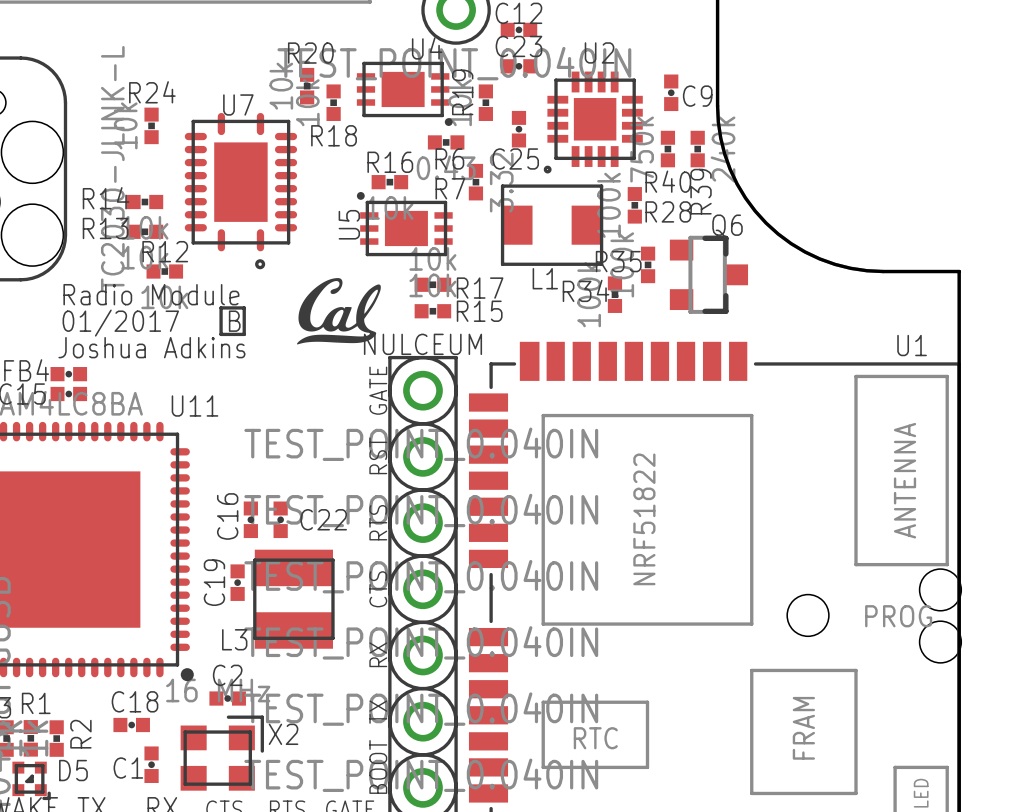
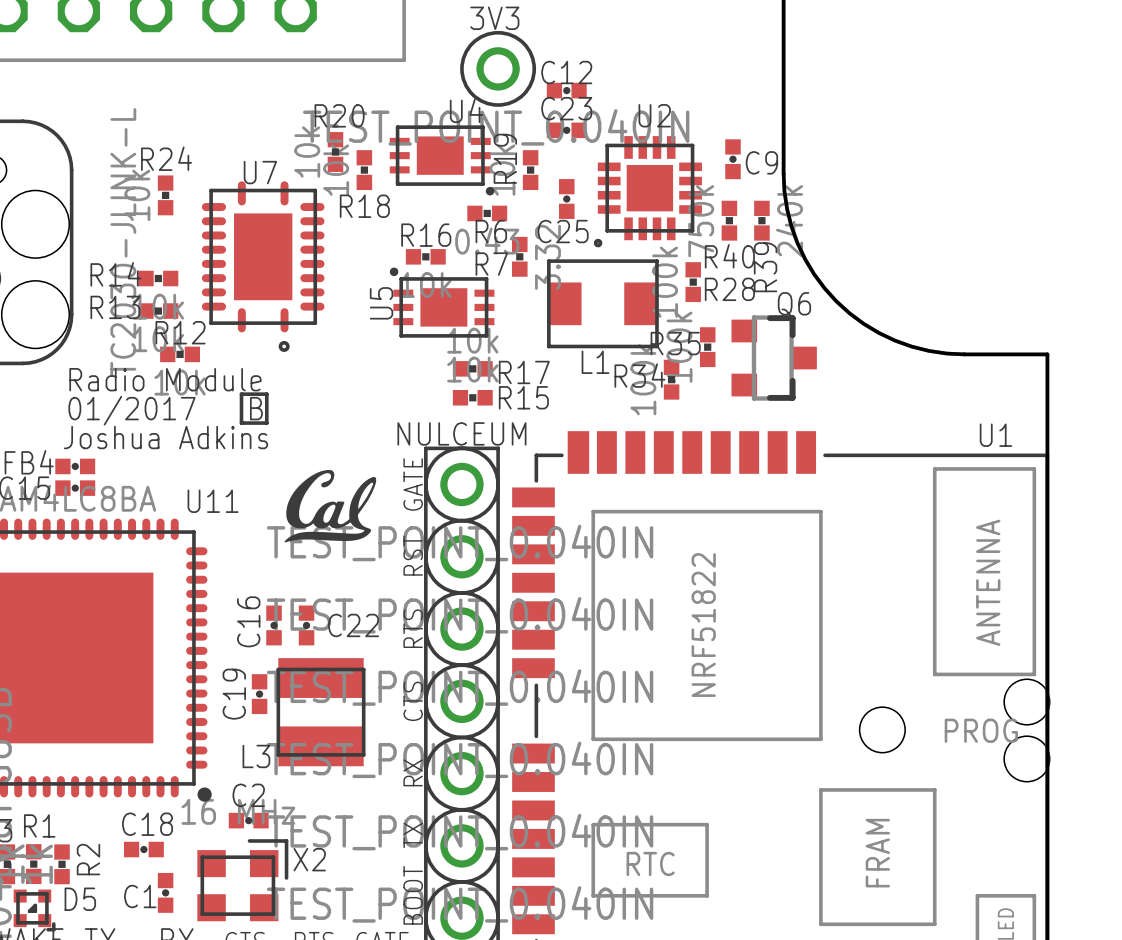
drawing position: (338, 311) -> (330, 506)

